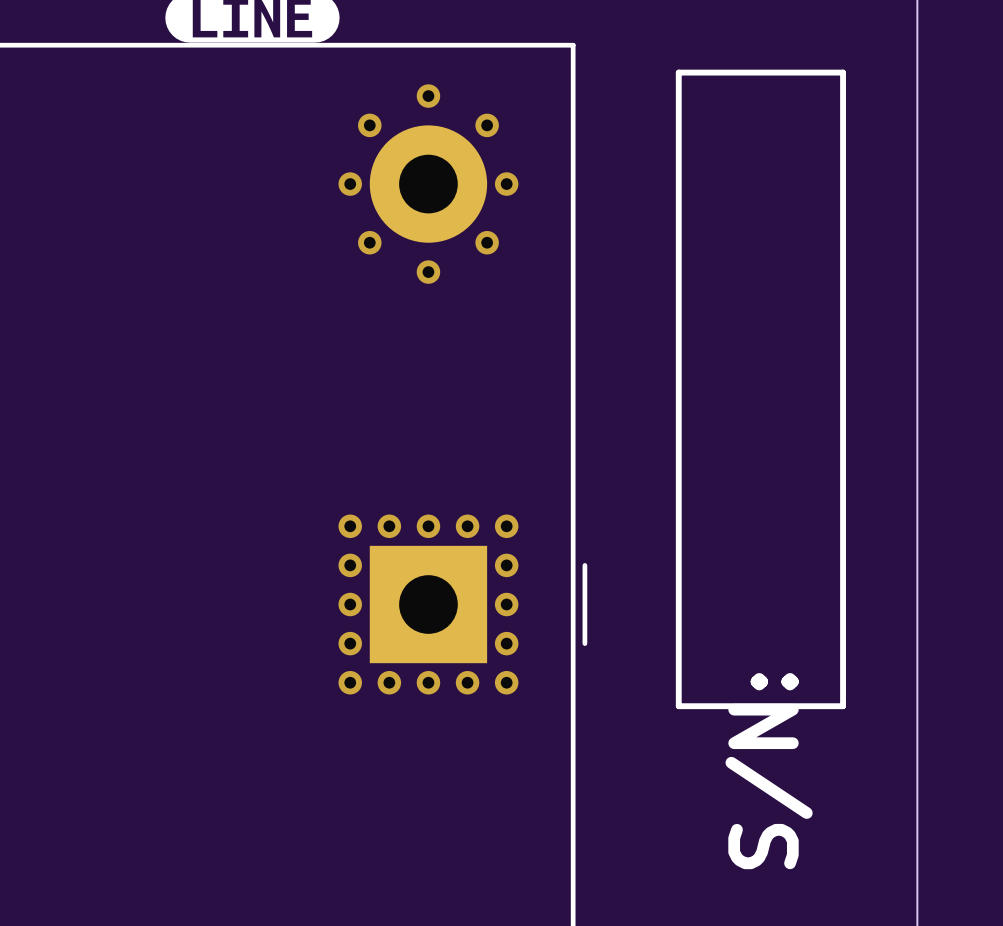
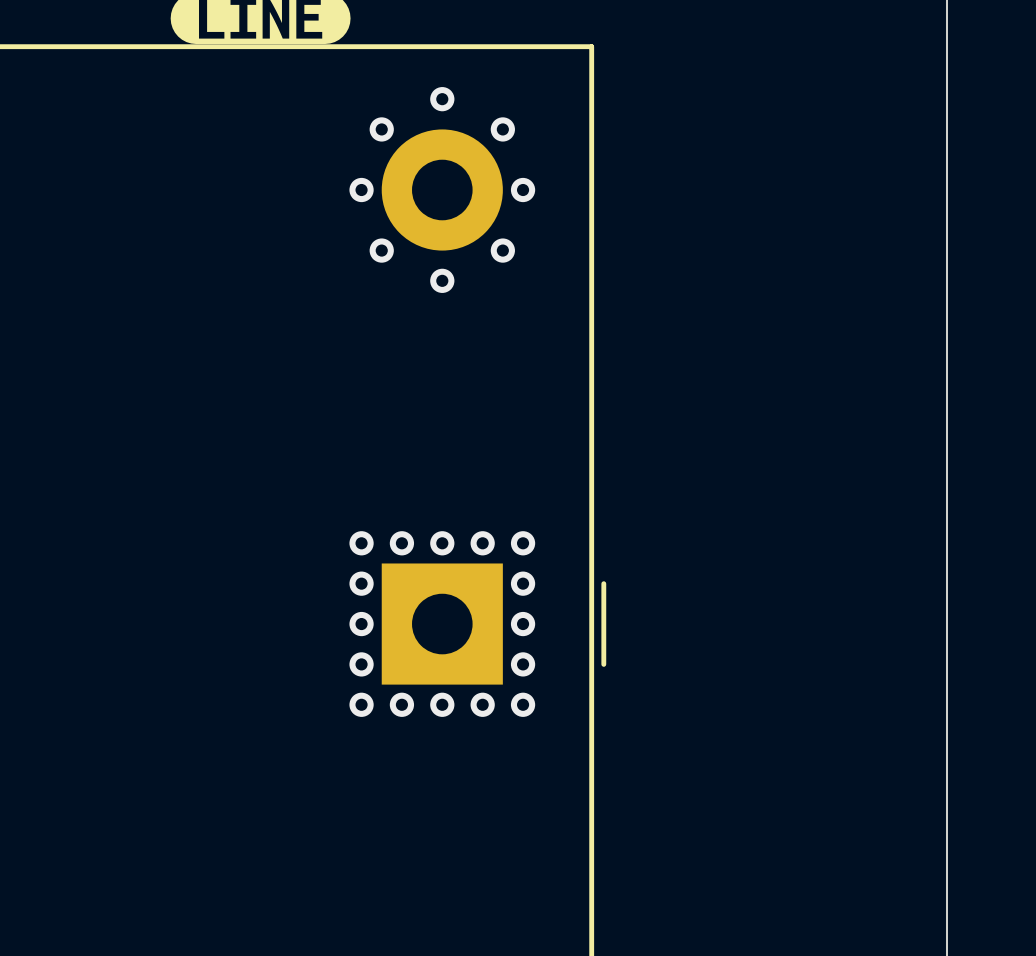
line: (678, 72) (843, 72) (843, 706) (678, 706) (678, 72) -> none
text: S/N: (769, 771) -> none

